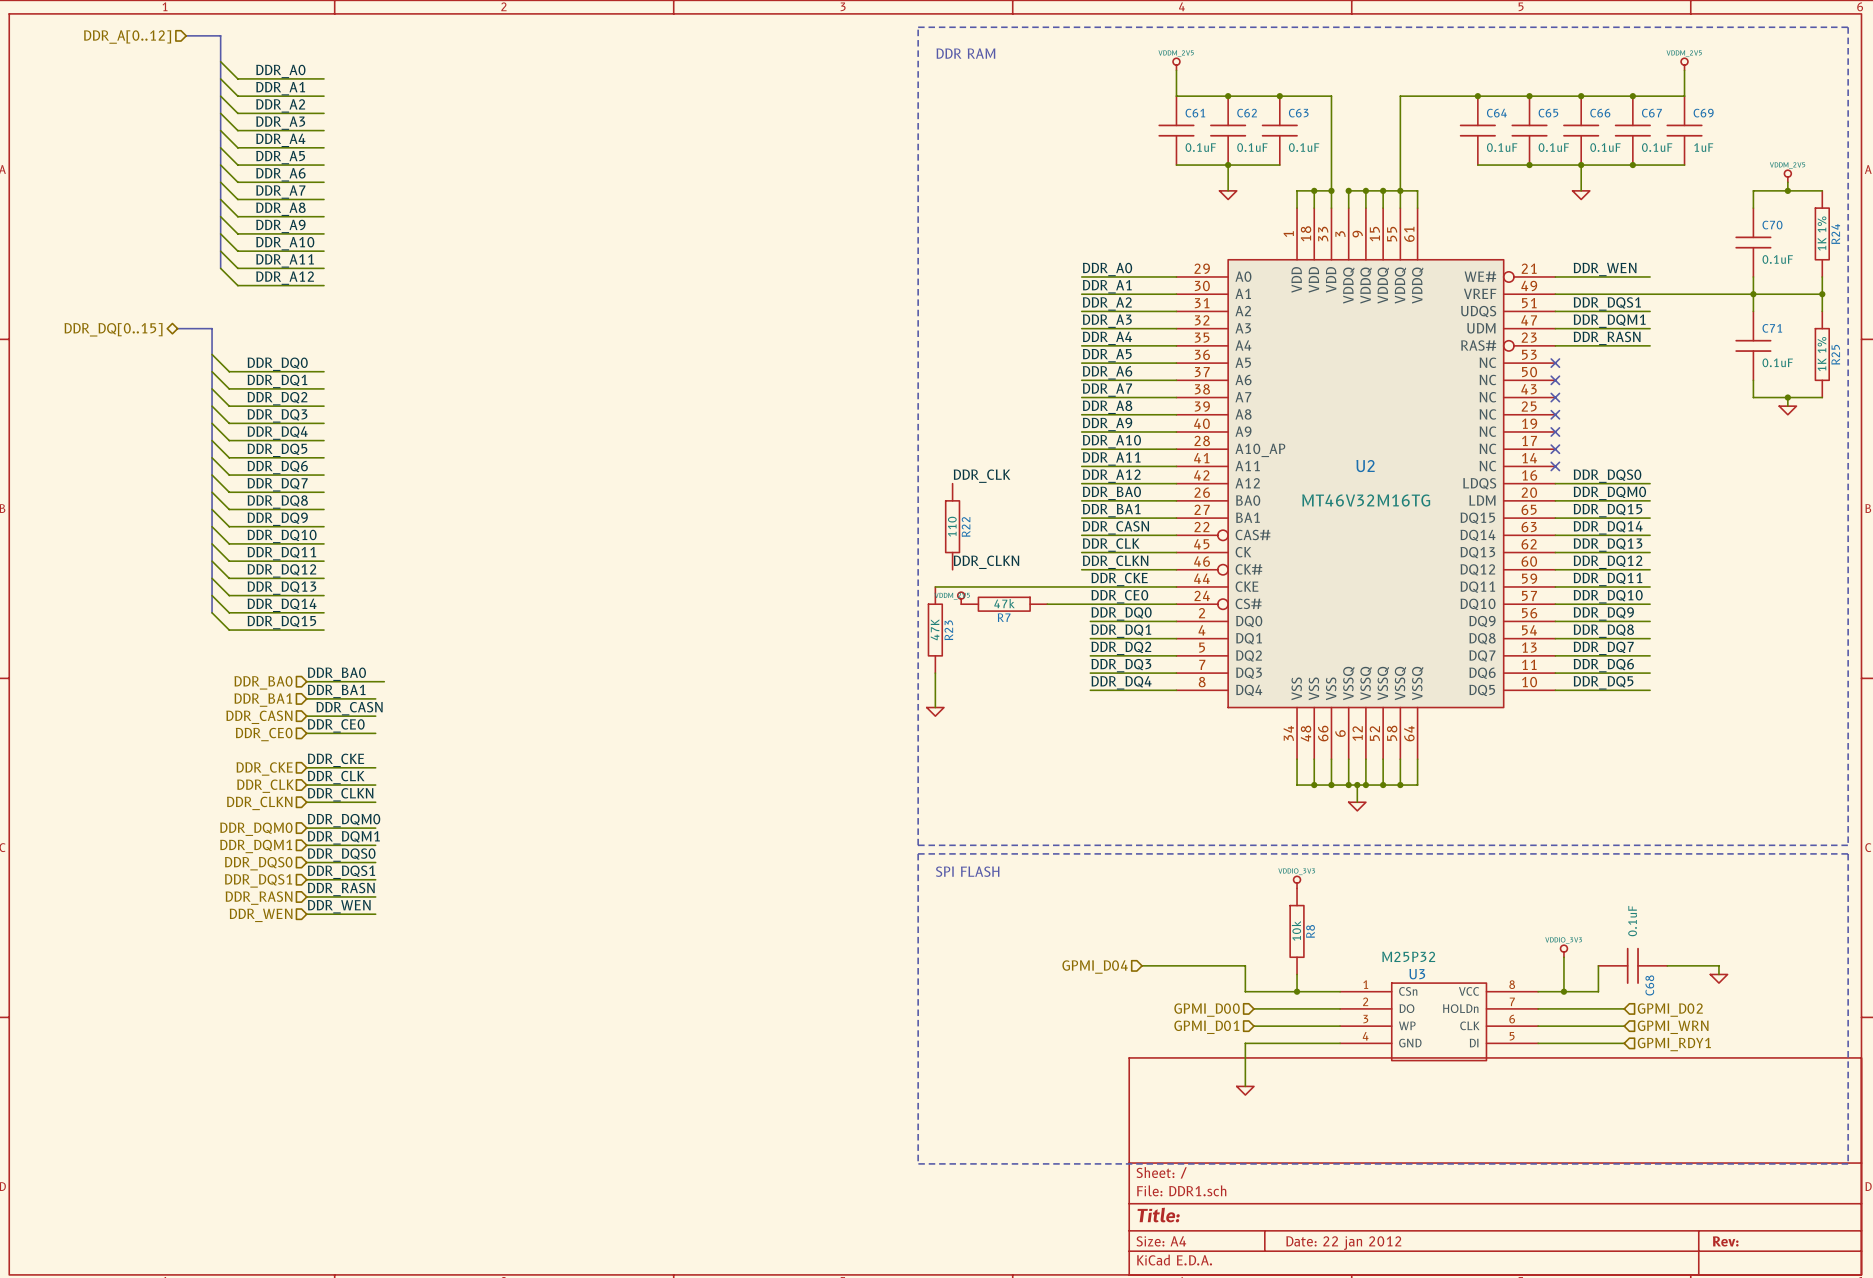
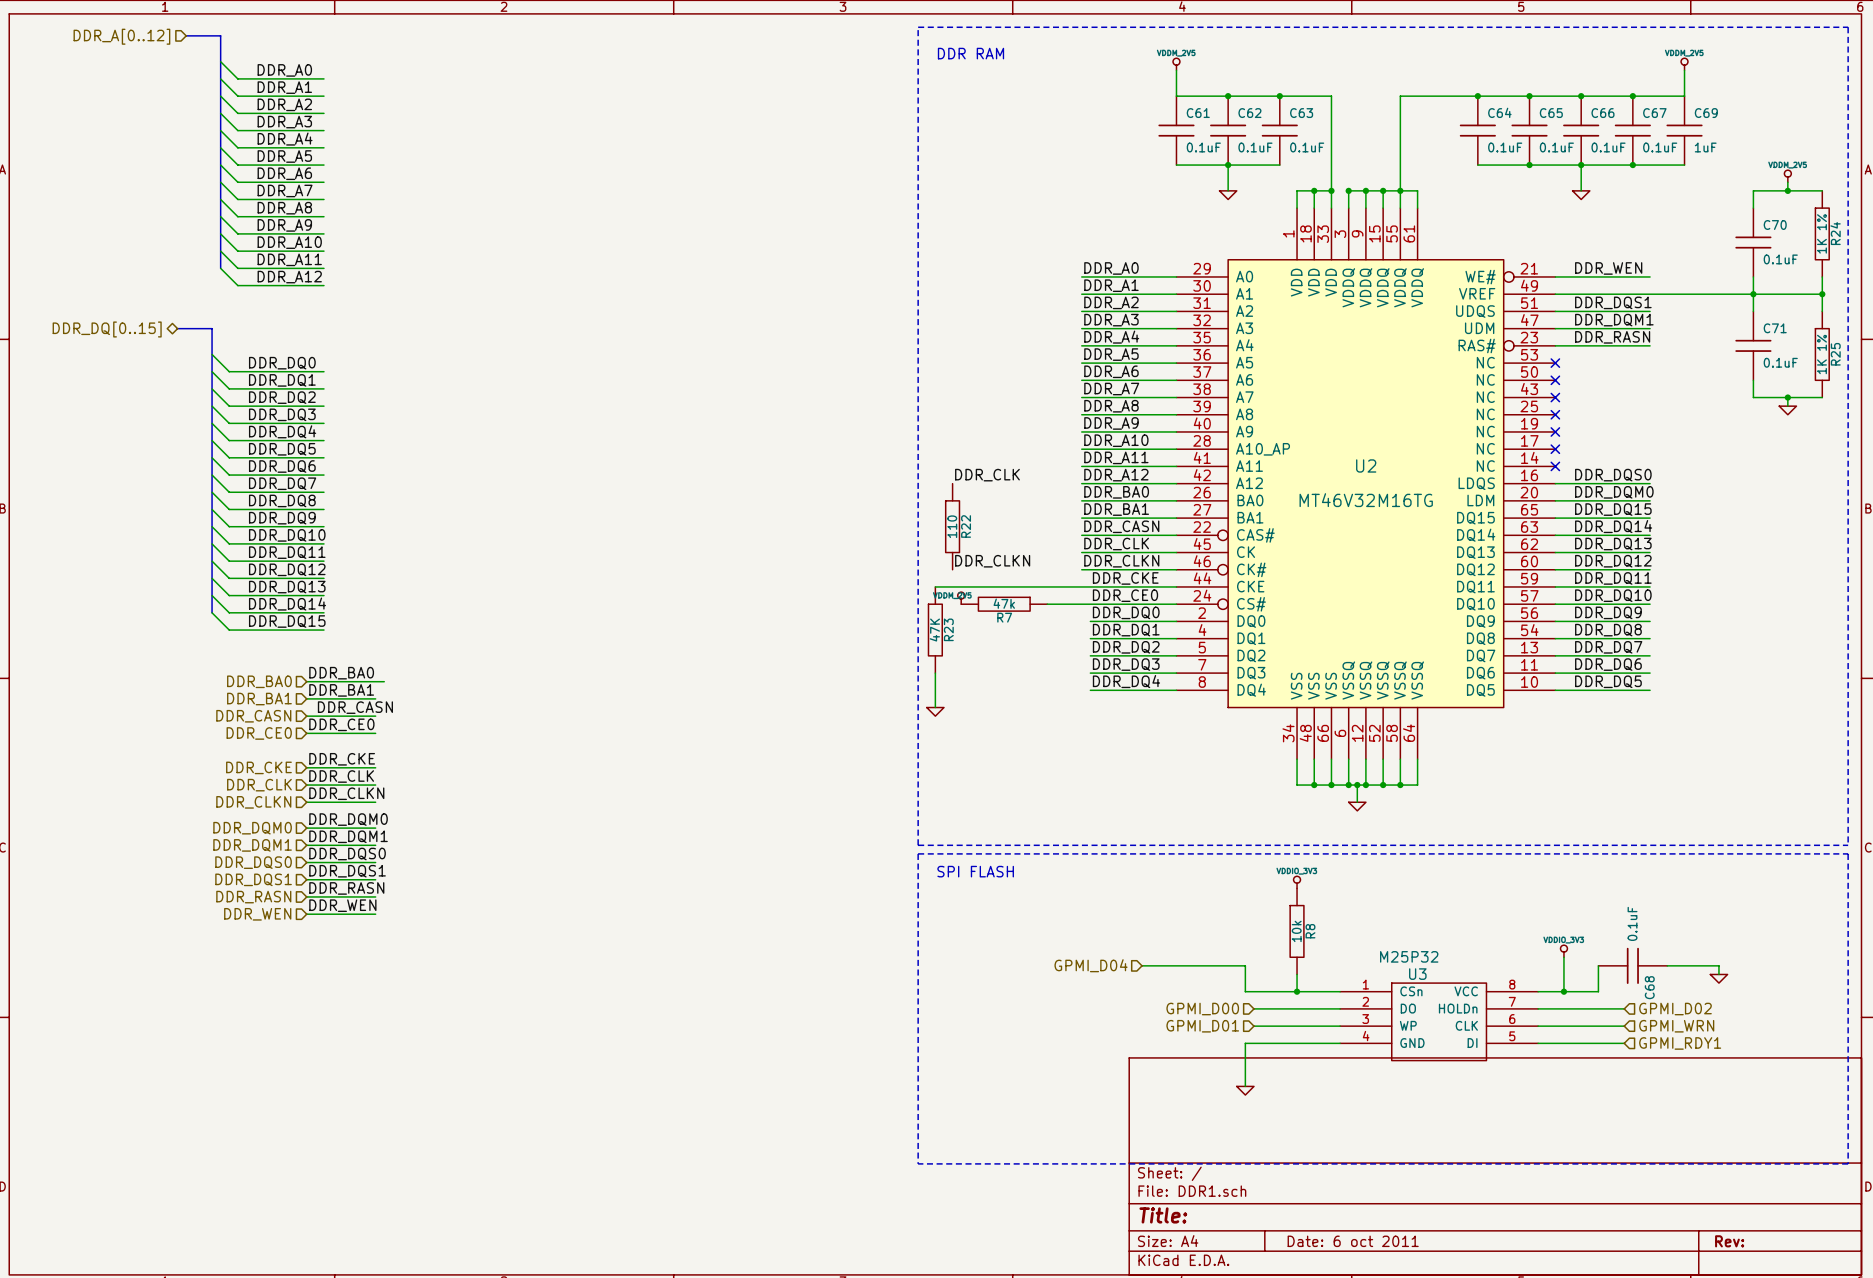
title block: Date: 22 jan 2012 (1343, 1243) -> Date: 6 oct 2011 (1353, 1241)

